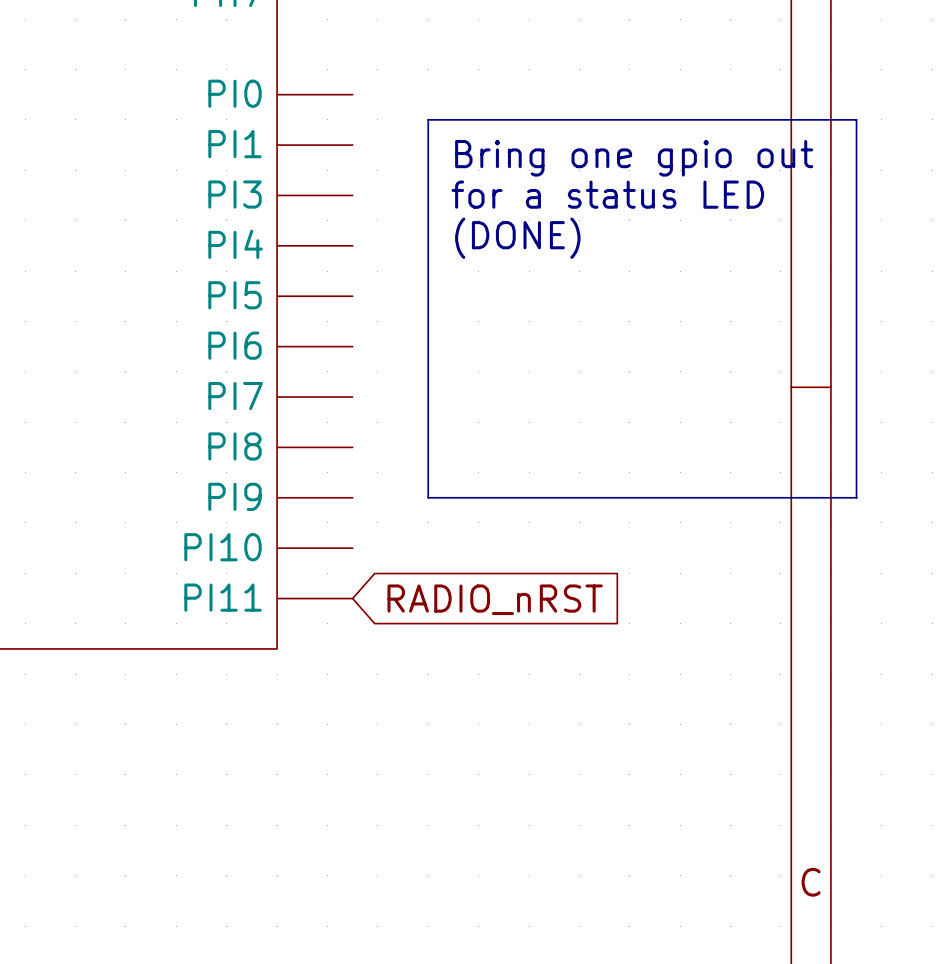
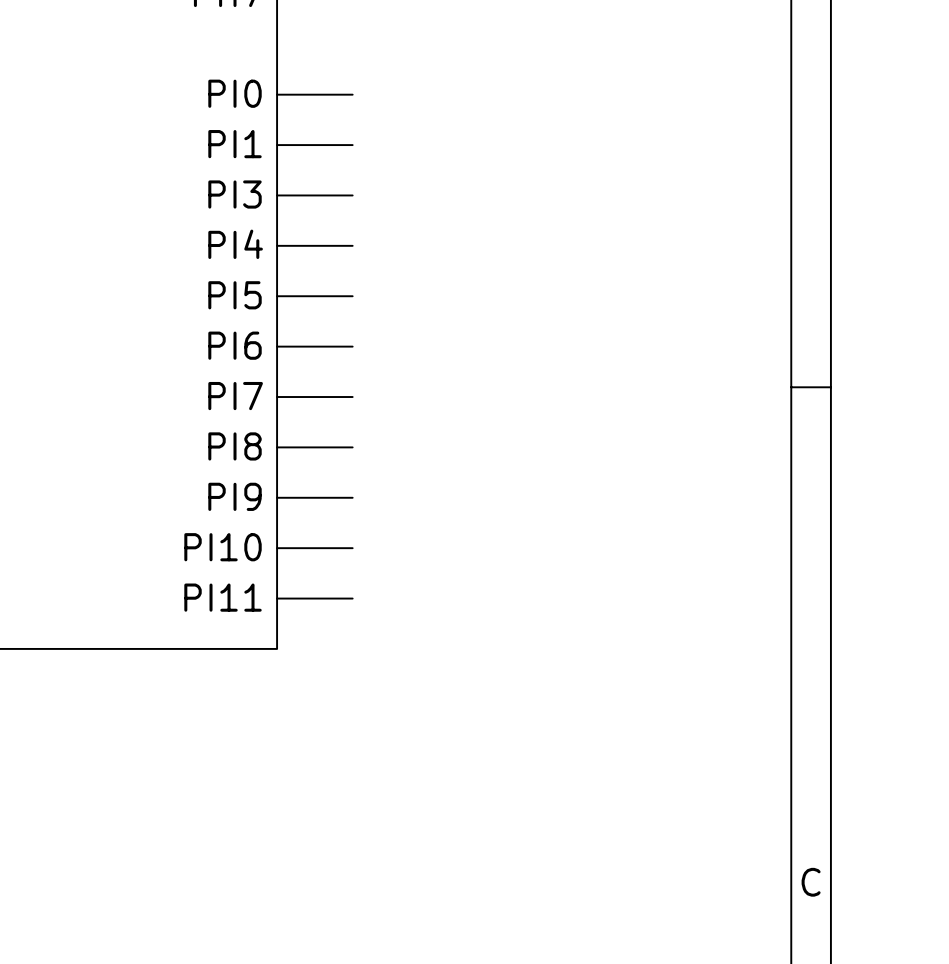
line: (428, 119) (856, 119) (856, 497) (428, 497) (428, 119) -> none
text: Bring one gpio out (634, 158) -> none
text: for a status LED (607, 194) -> none
text: (DONE) (517, 238) -> none
global label: RADIO_nRST (495, 599) -> none

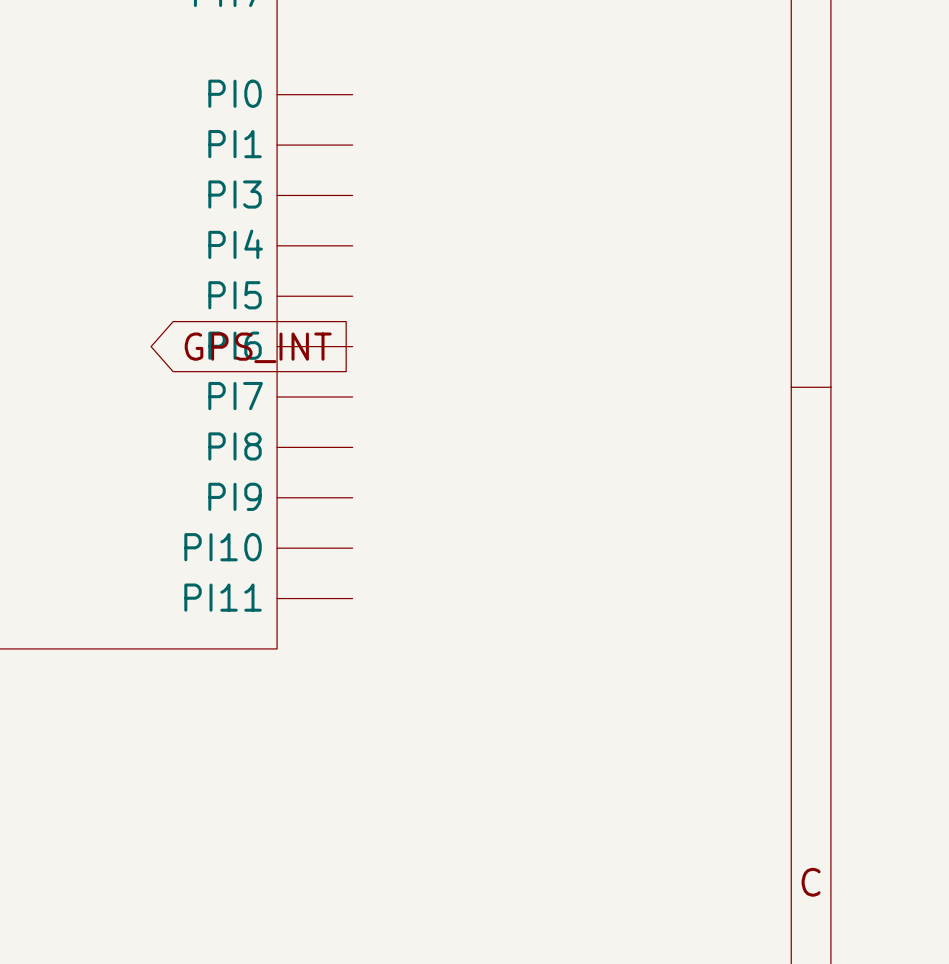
global label: none -> GPS_INT (258, 347)

